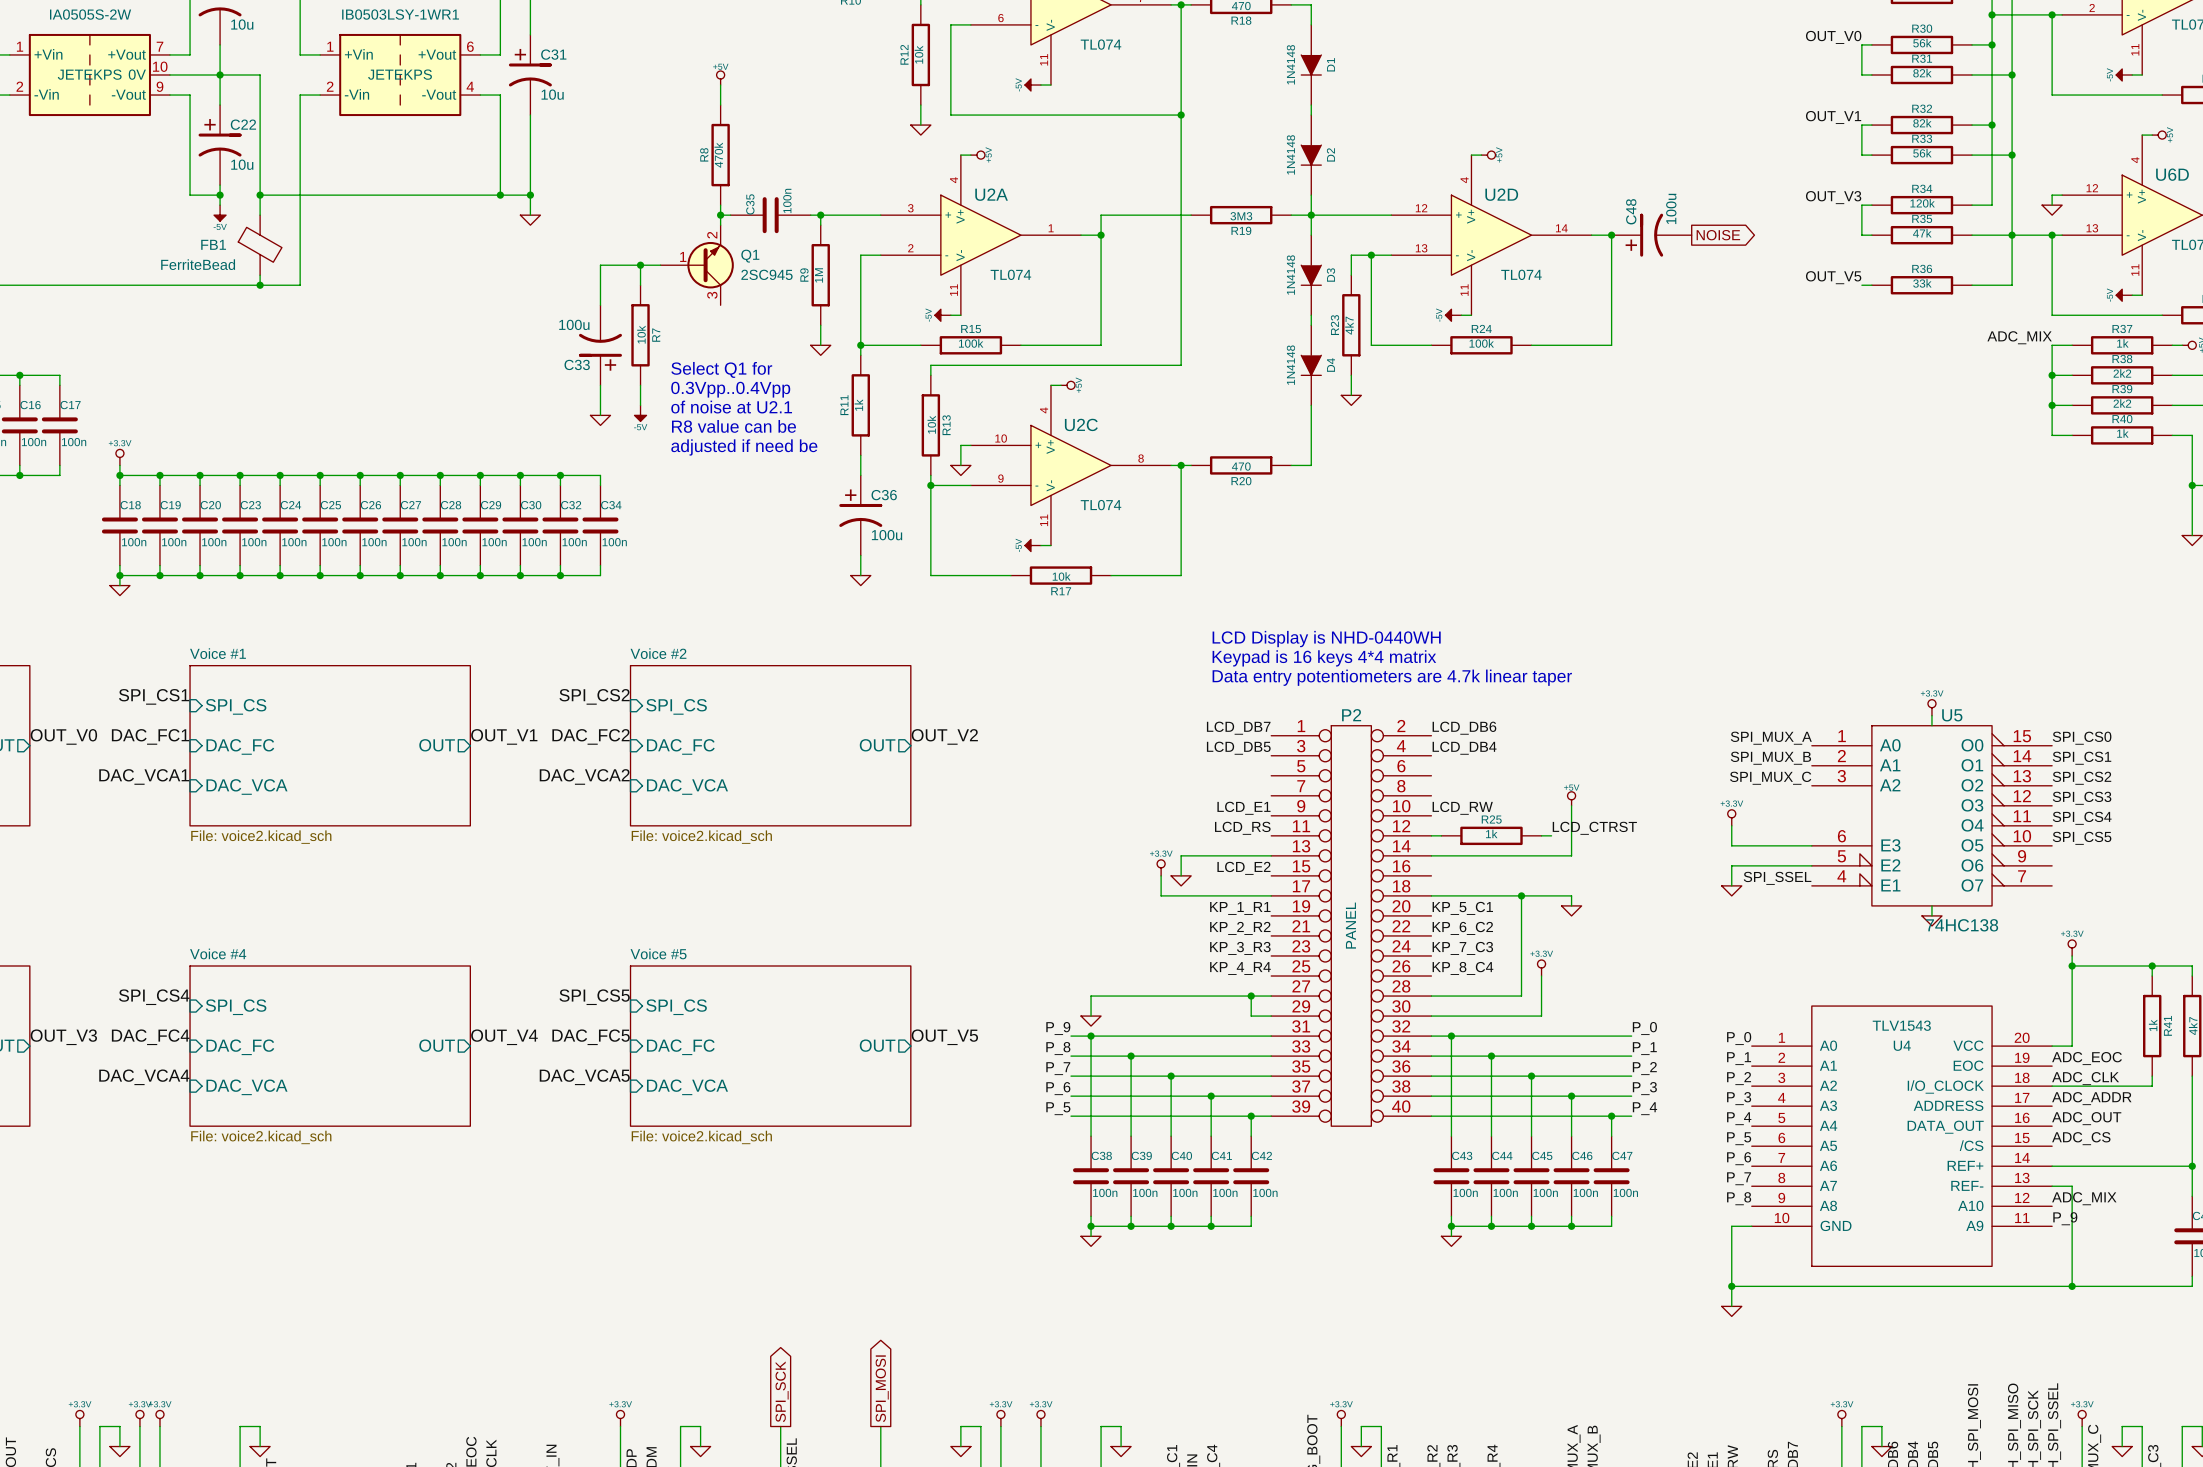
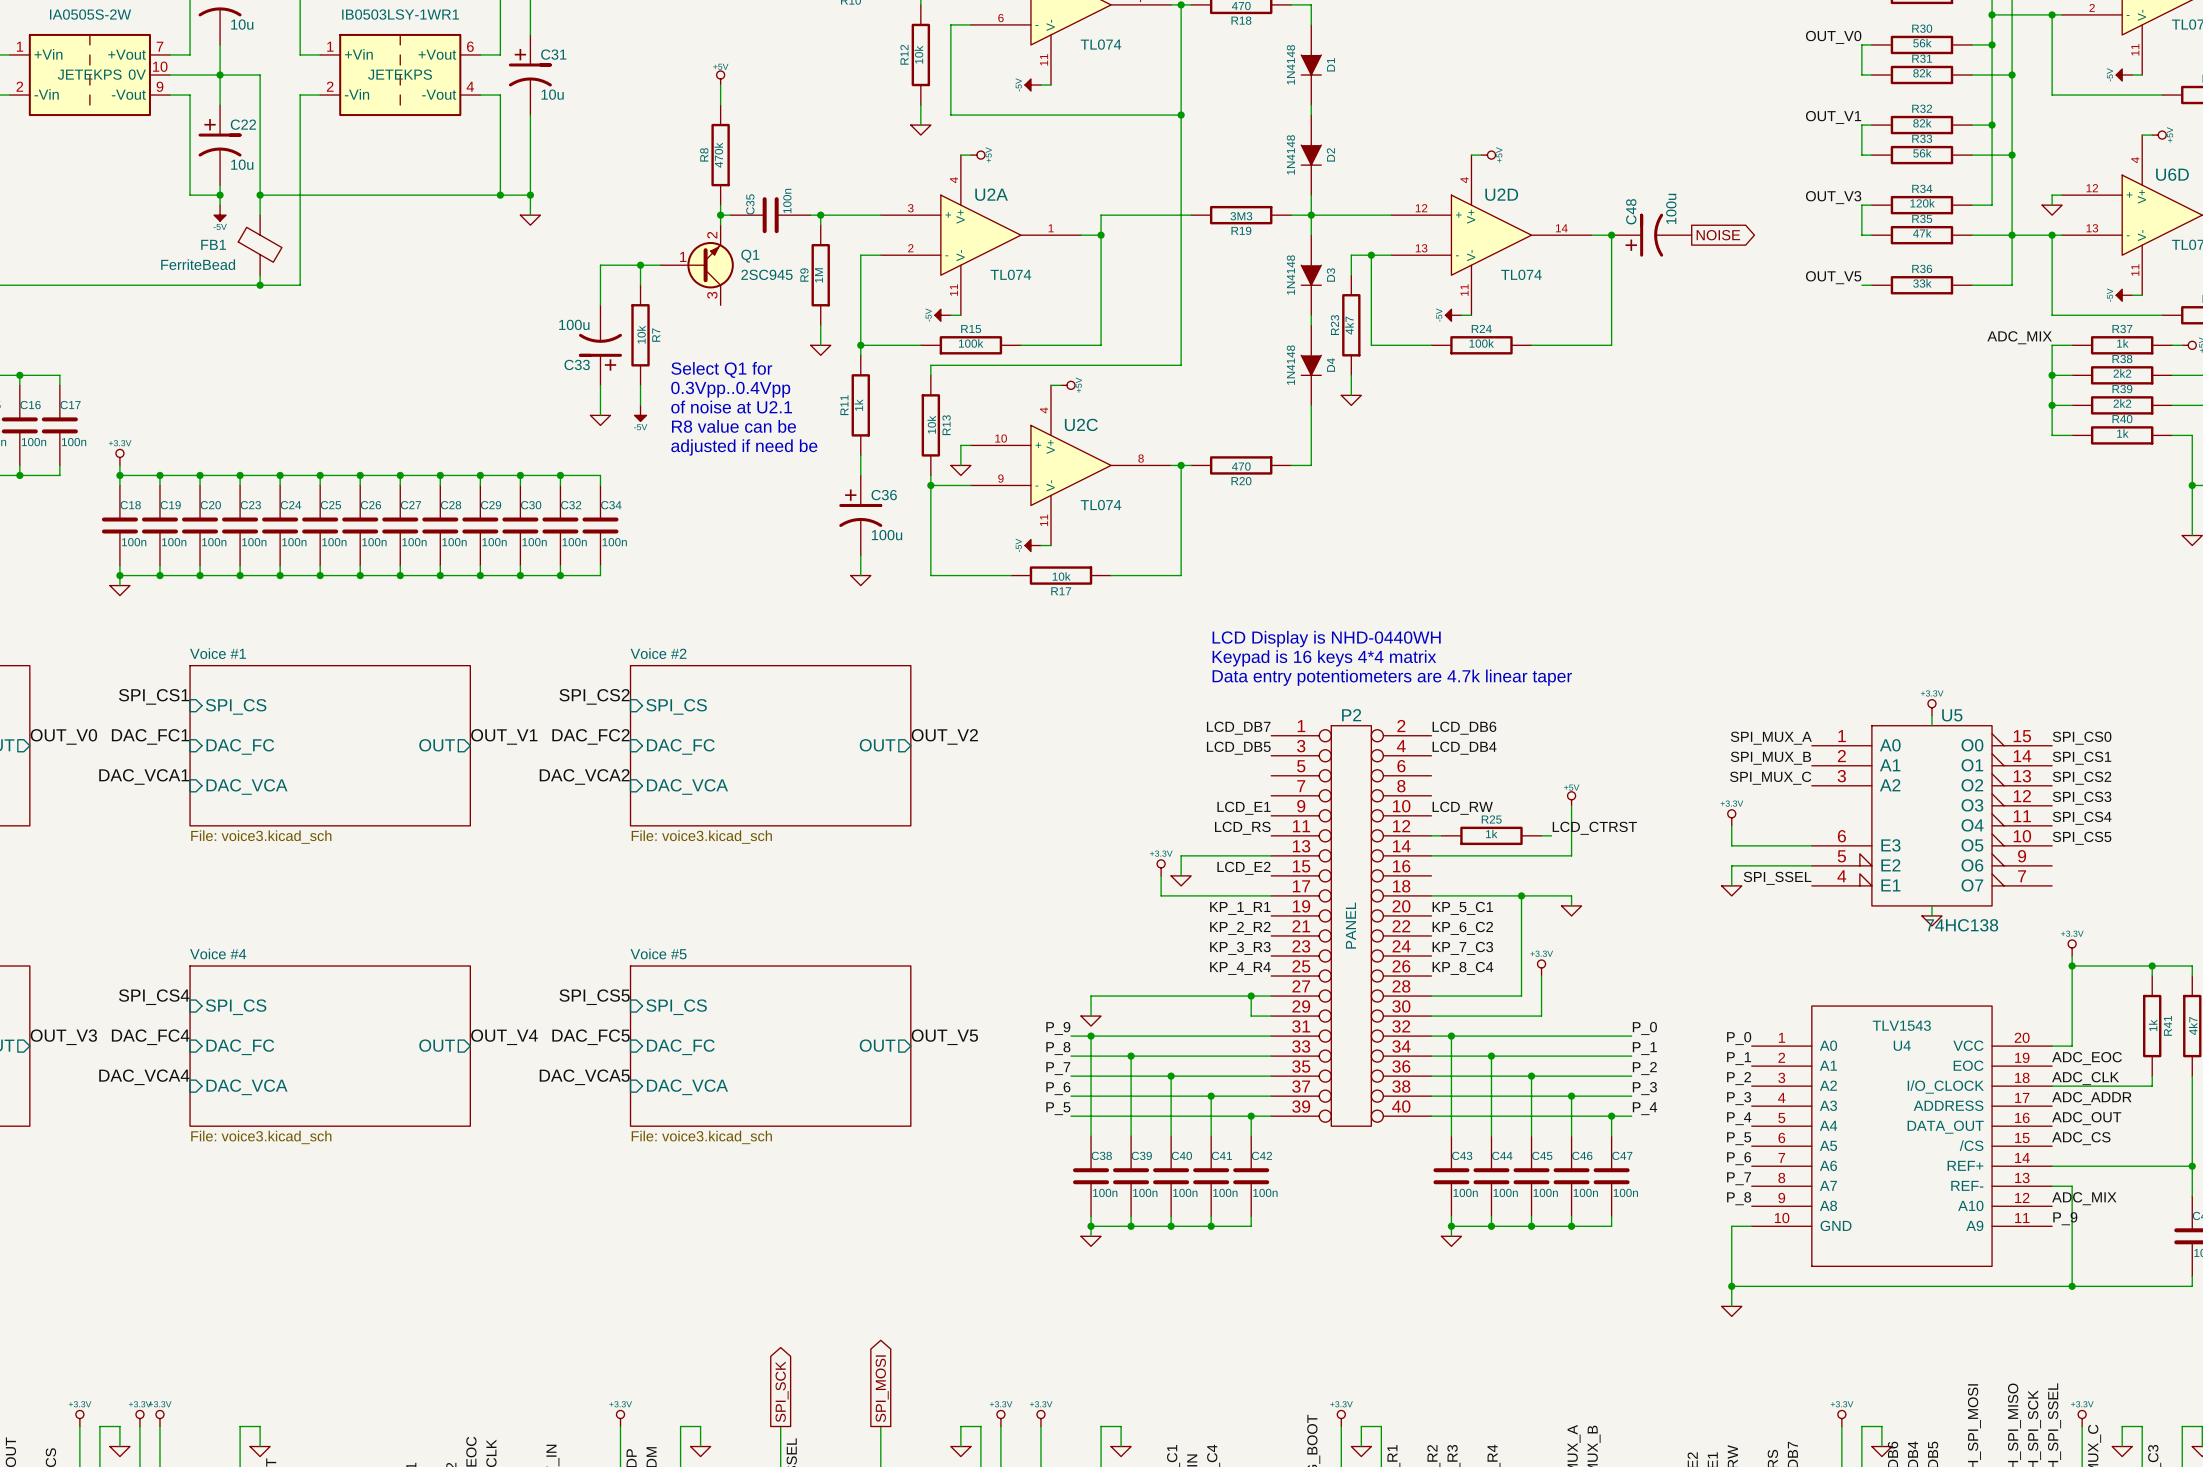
sheet Voice #1 value: File: voice2.kicad_sch (261, 837) -> File: voice3.kicad_sch (261, 837)
sheet Voice #2 value: File: voice2.kicad_sch (701, 837) -> File: voice3.kicad_sch (701, 837)
sheet Voice #4 value: File: voice2.kicad_sch (261, 1137) -> File: voice3.kicad_sch (261, 1137)
sheet Voice #5 value: File: voice2.kicad_sch (701, 1137) -> File: voice3.kicad_sch (701, 1137)

